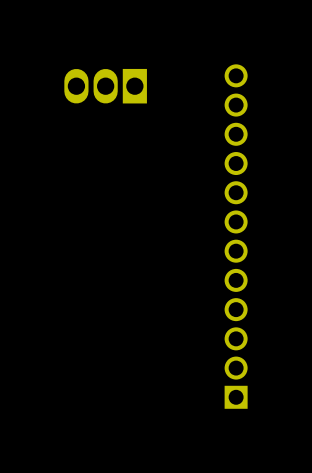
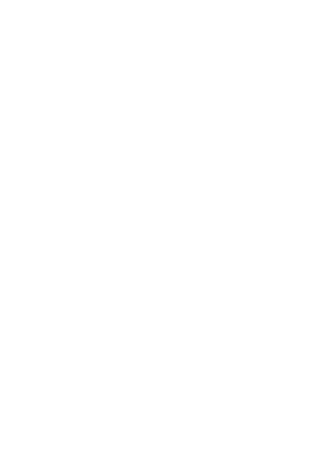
part: (105, 86) -> none
part: (236, 236) -> none

